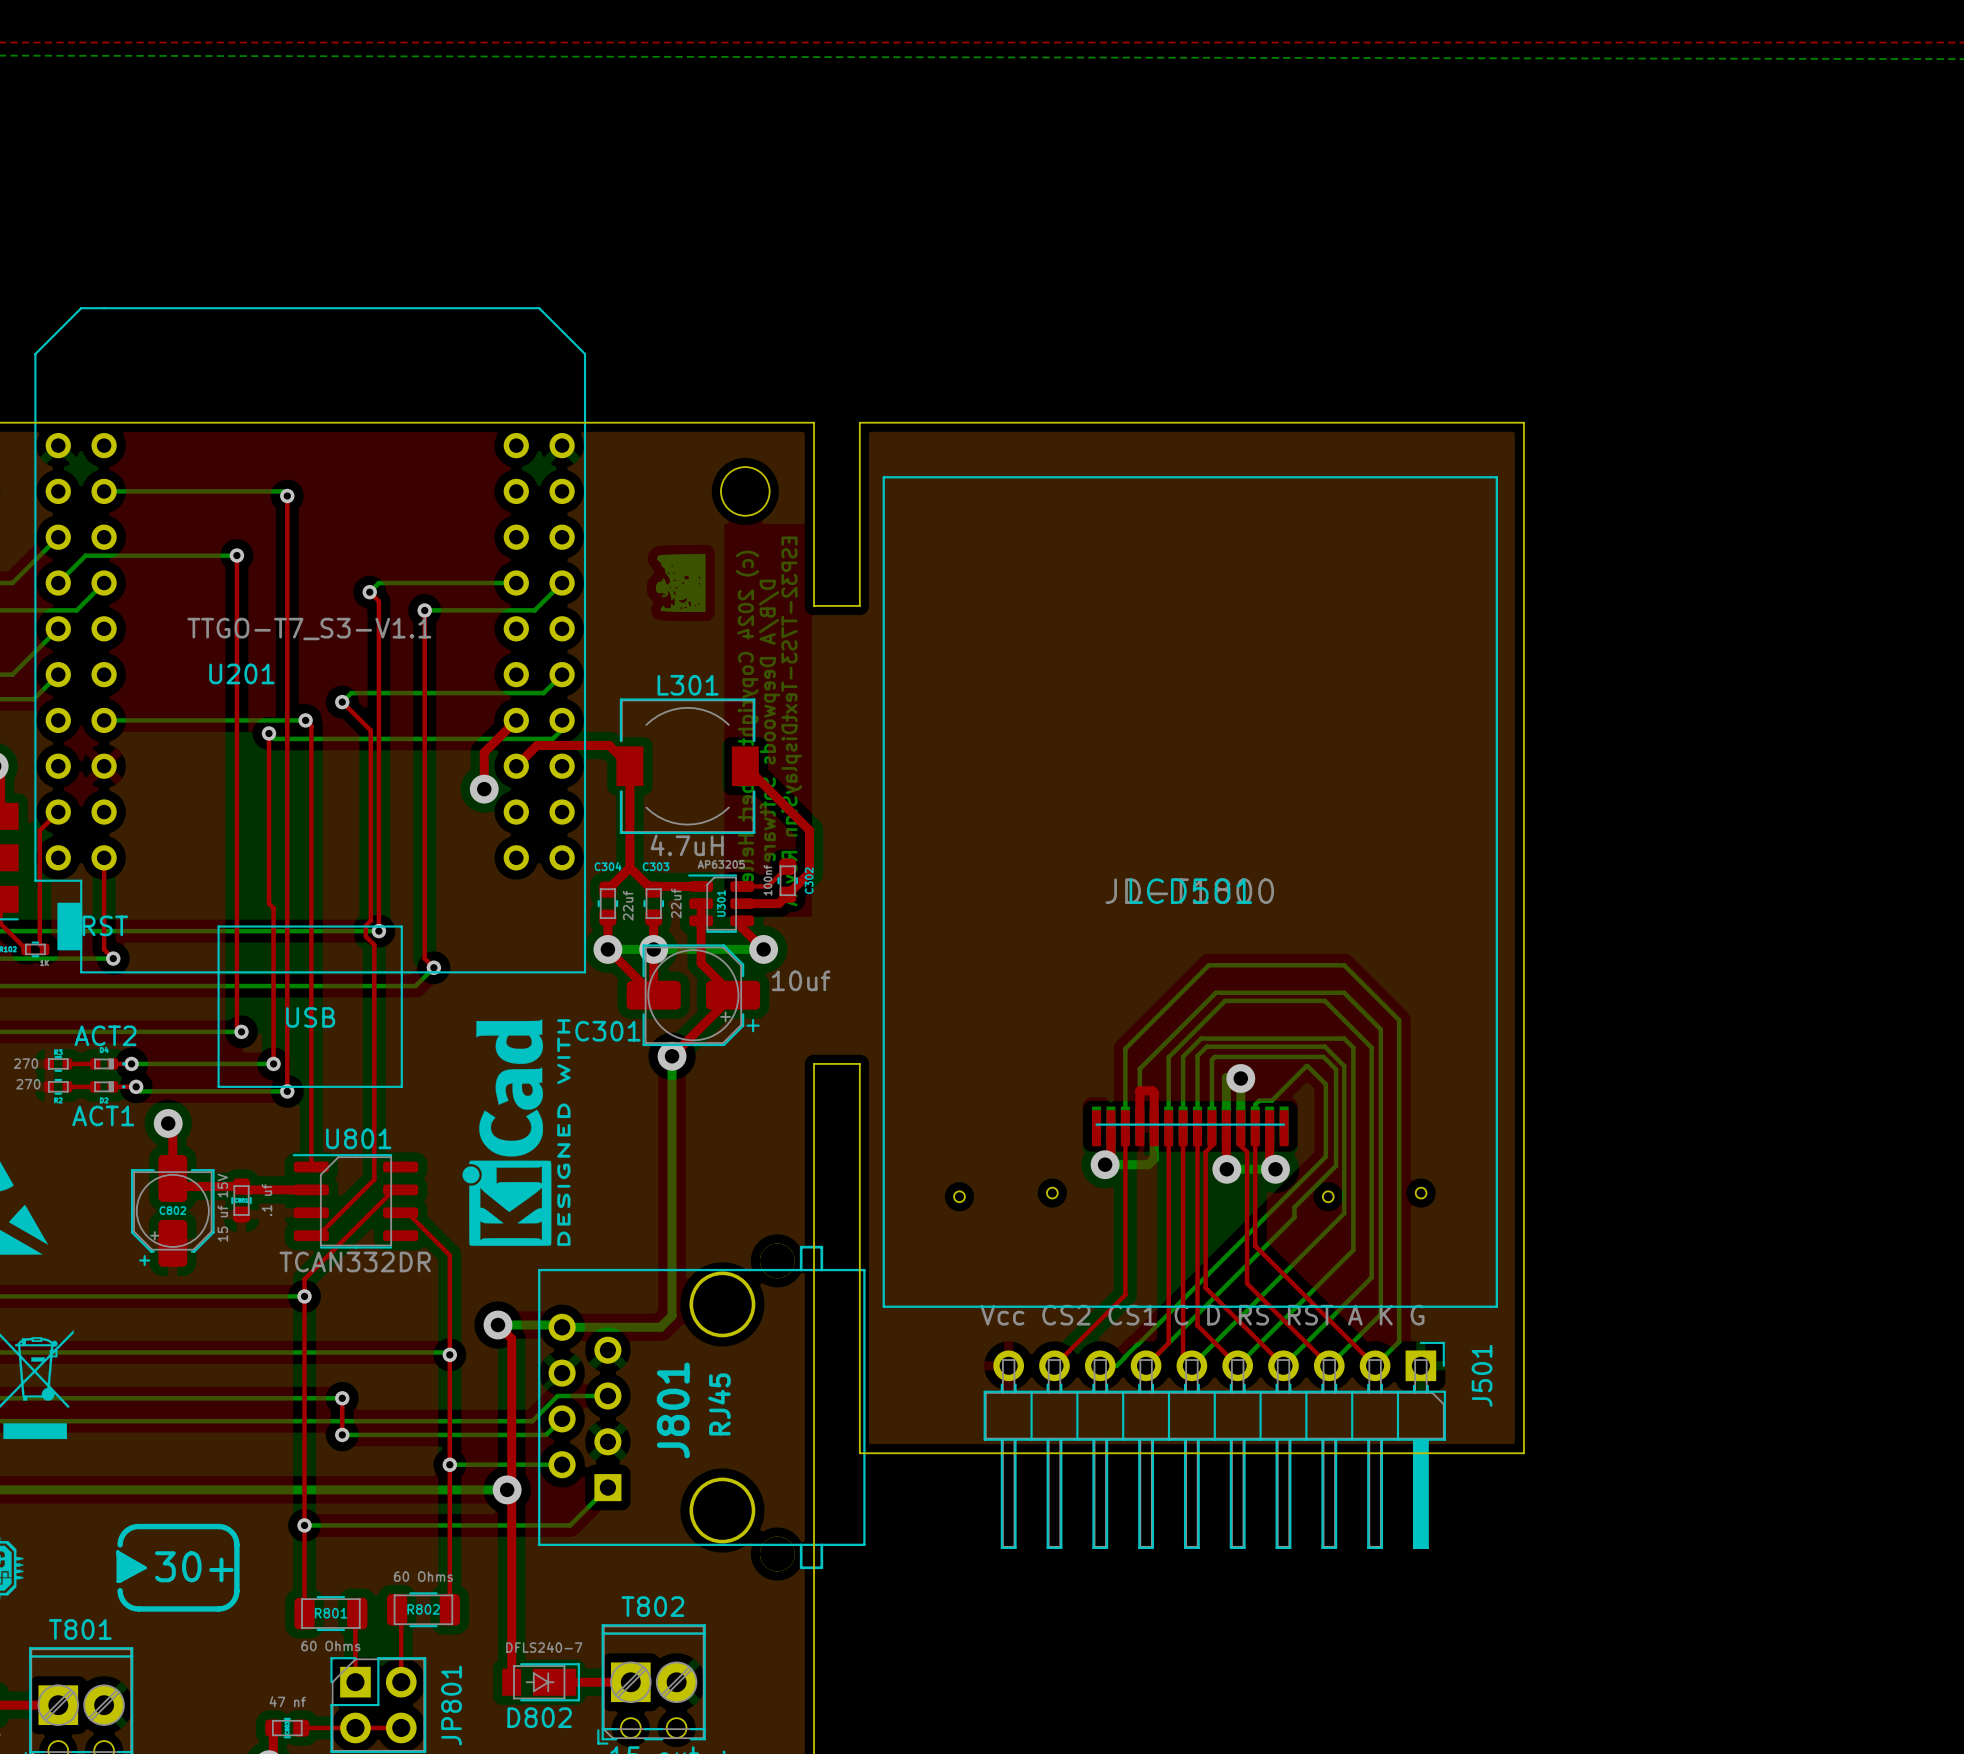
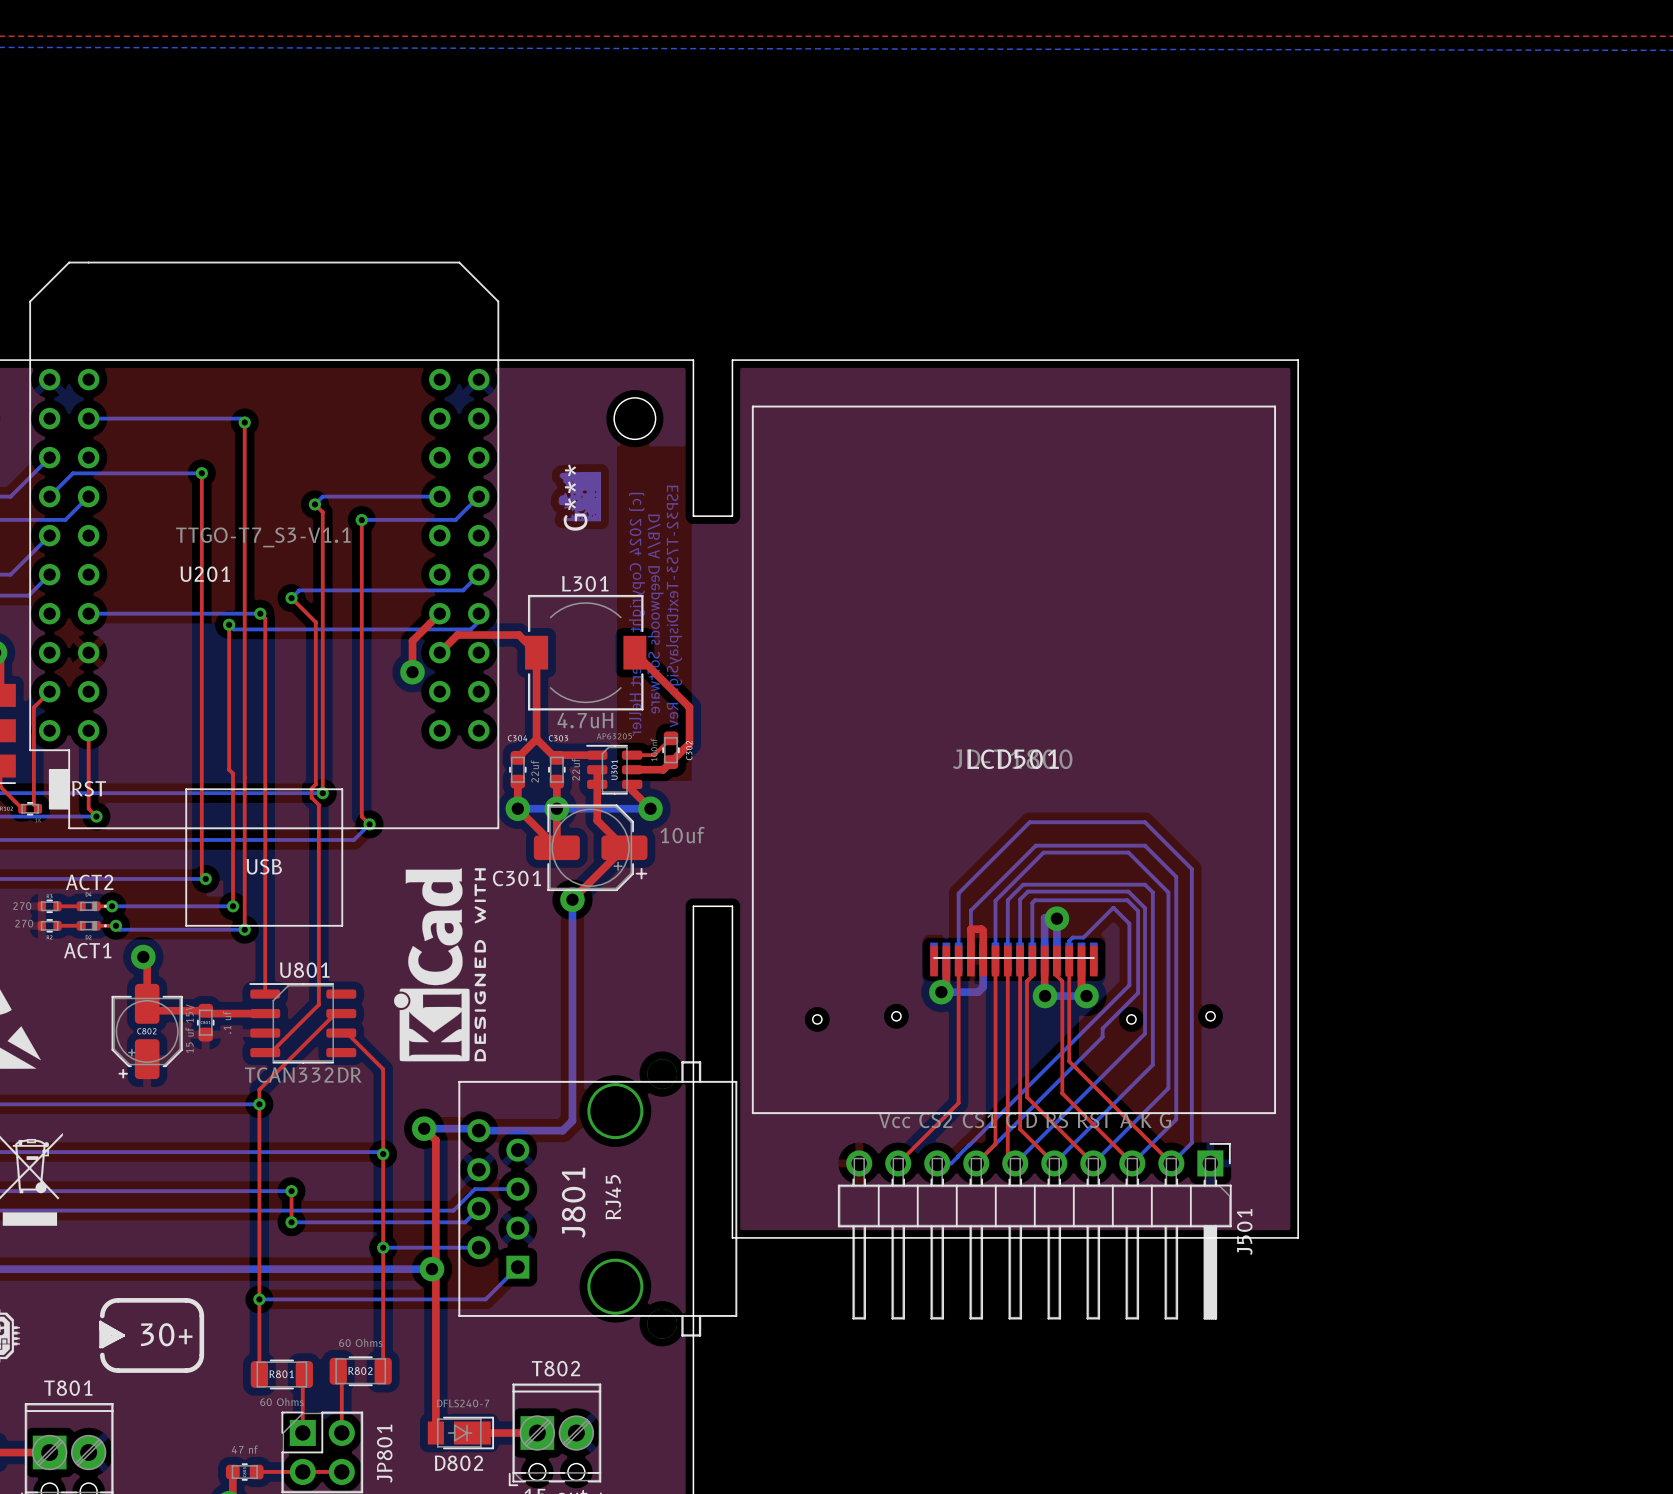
drawing: [655, 553, 706, 612] -> none
G***: none -> (579, 496)
J501 name position: J501 (1482, 1375) -> J501 (1244, 1232)

